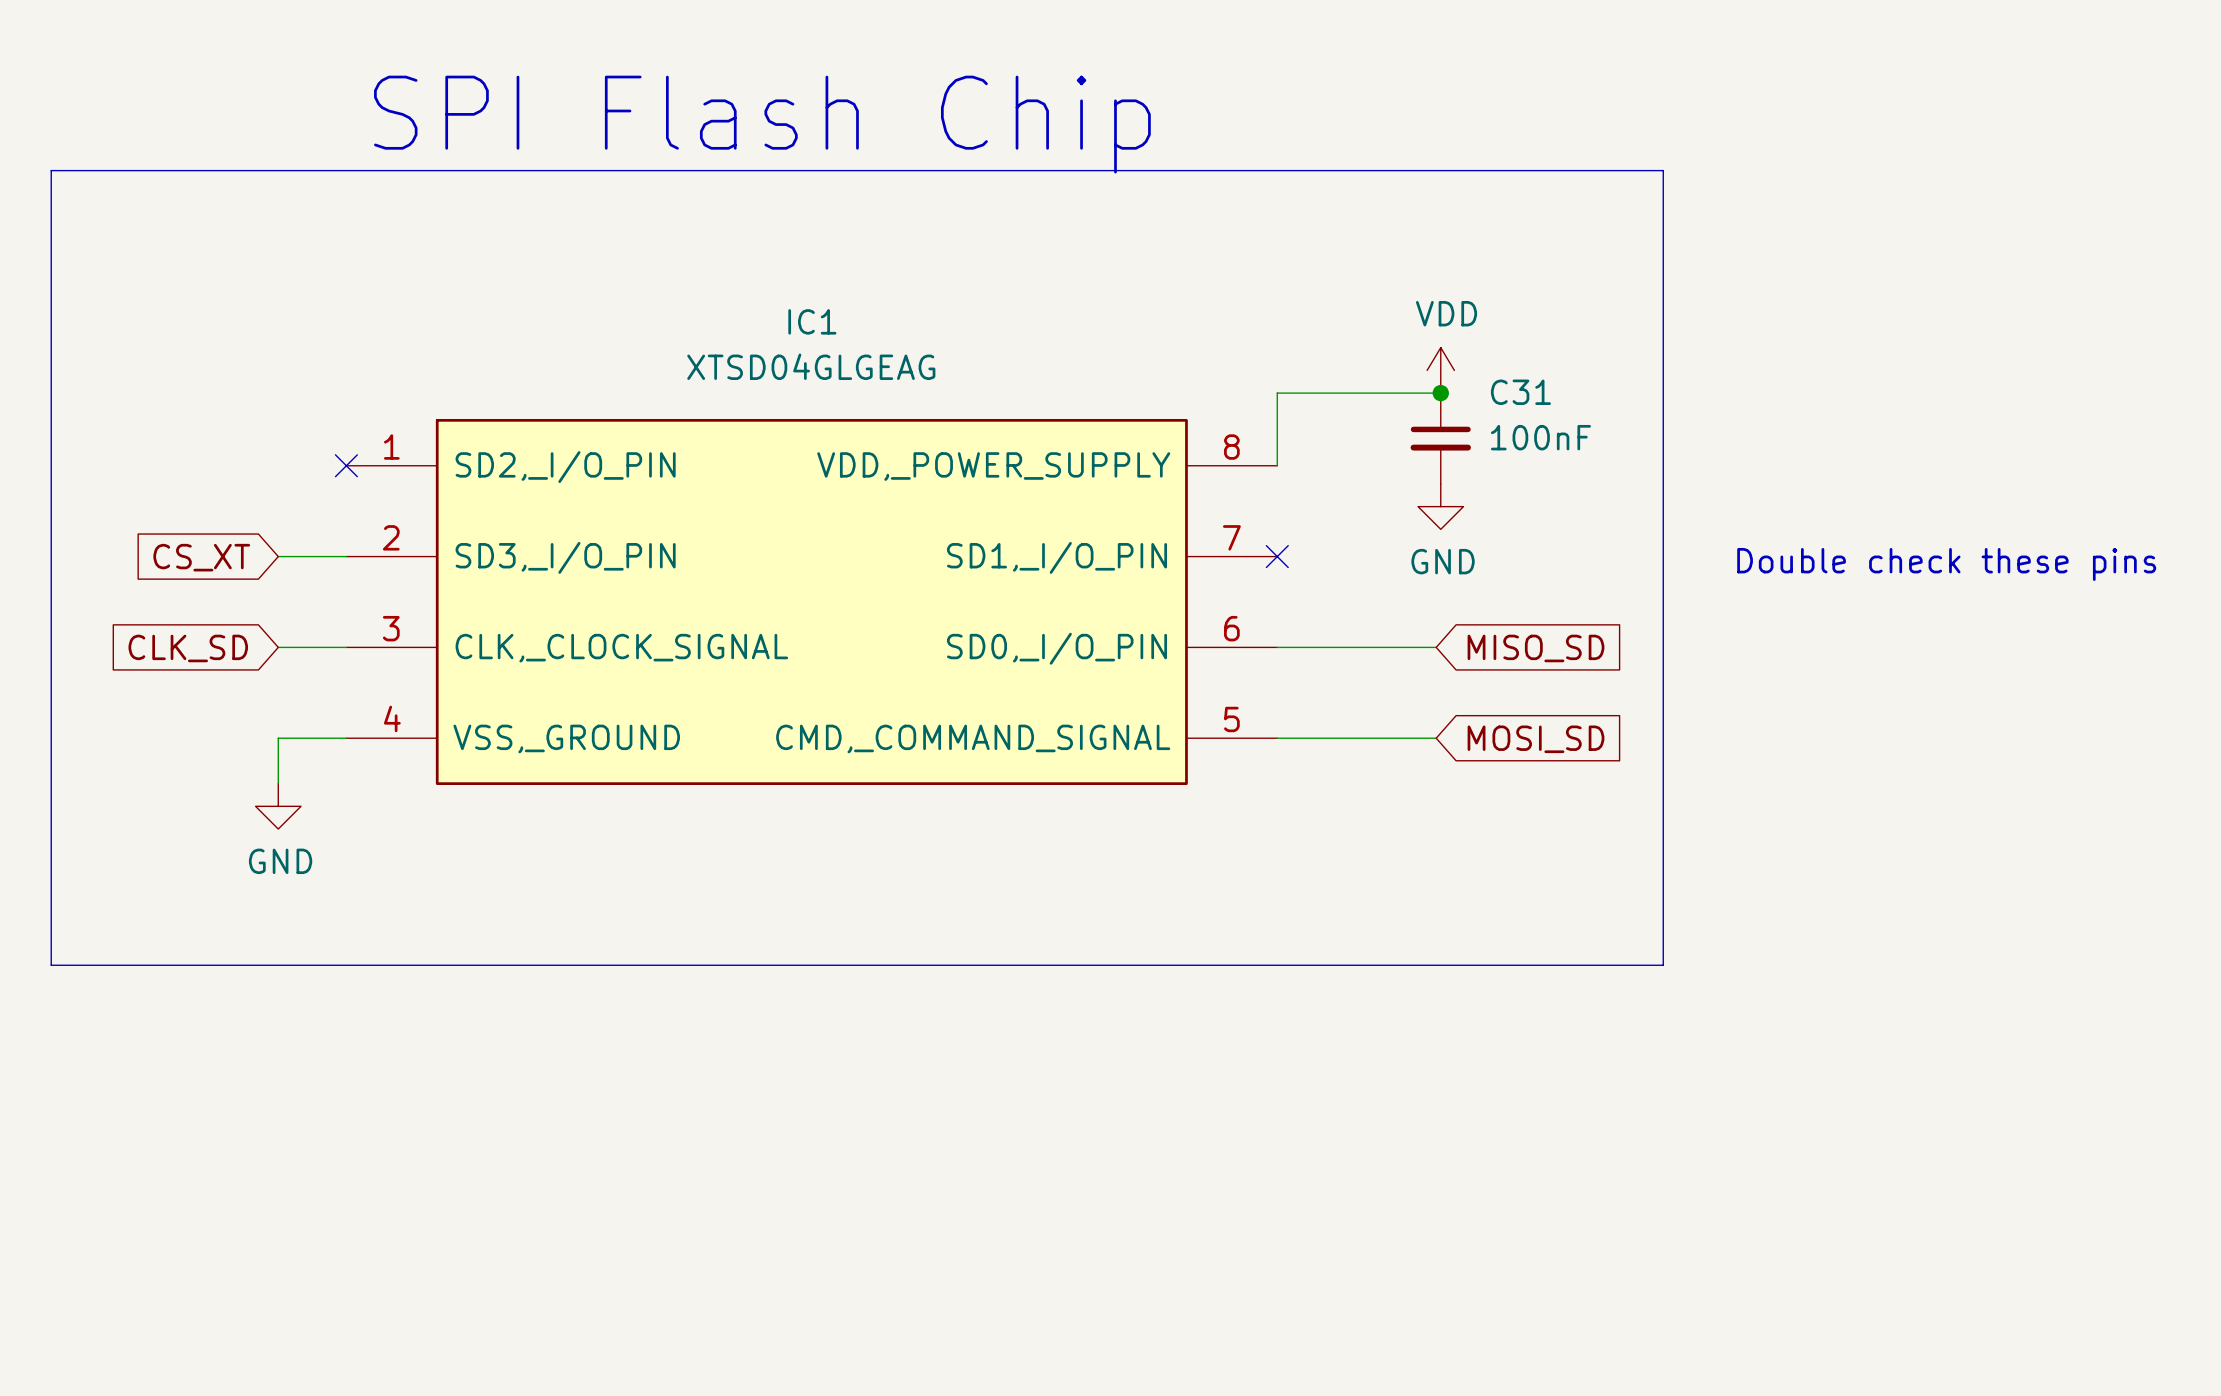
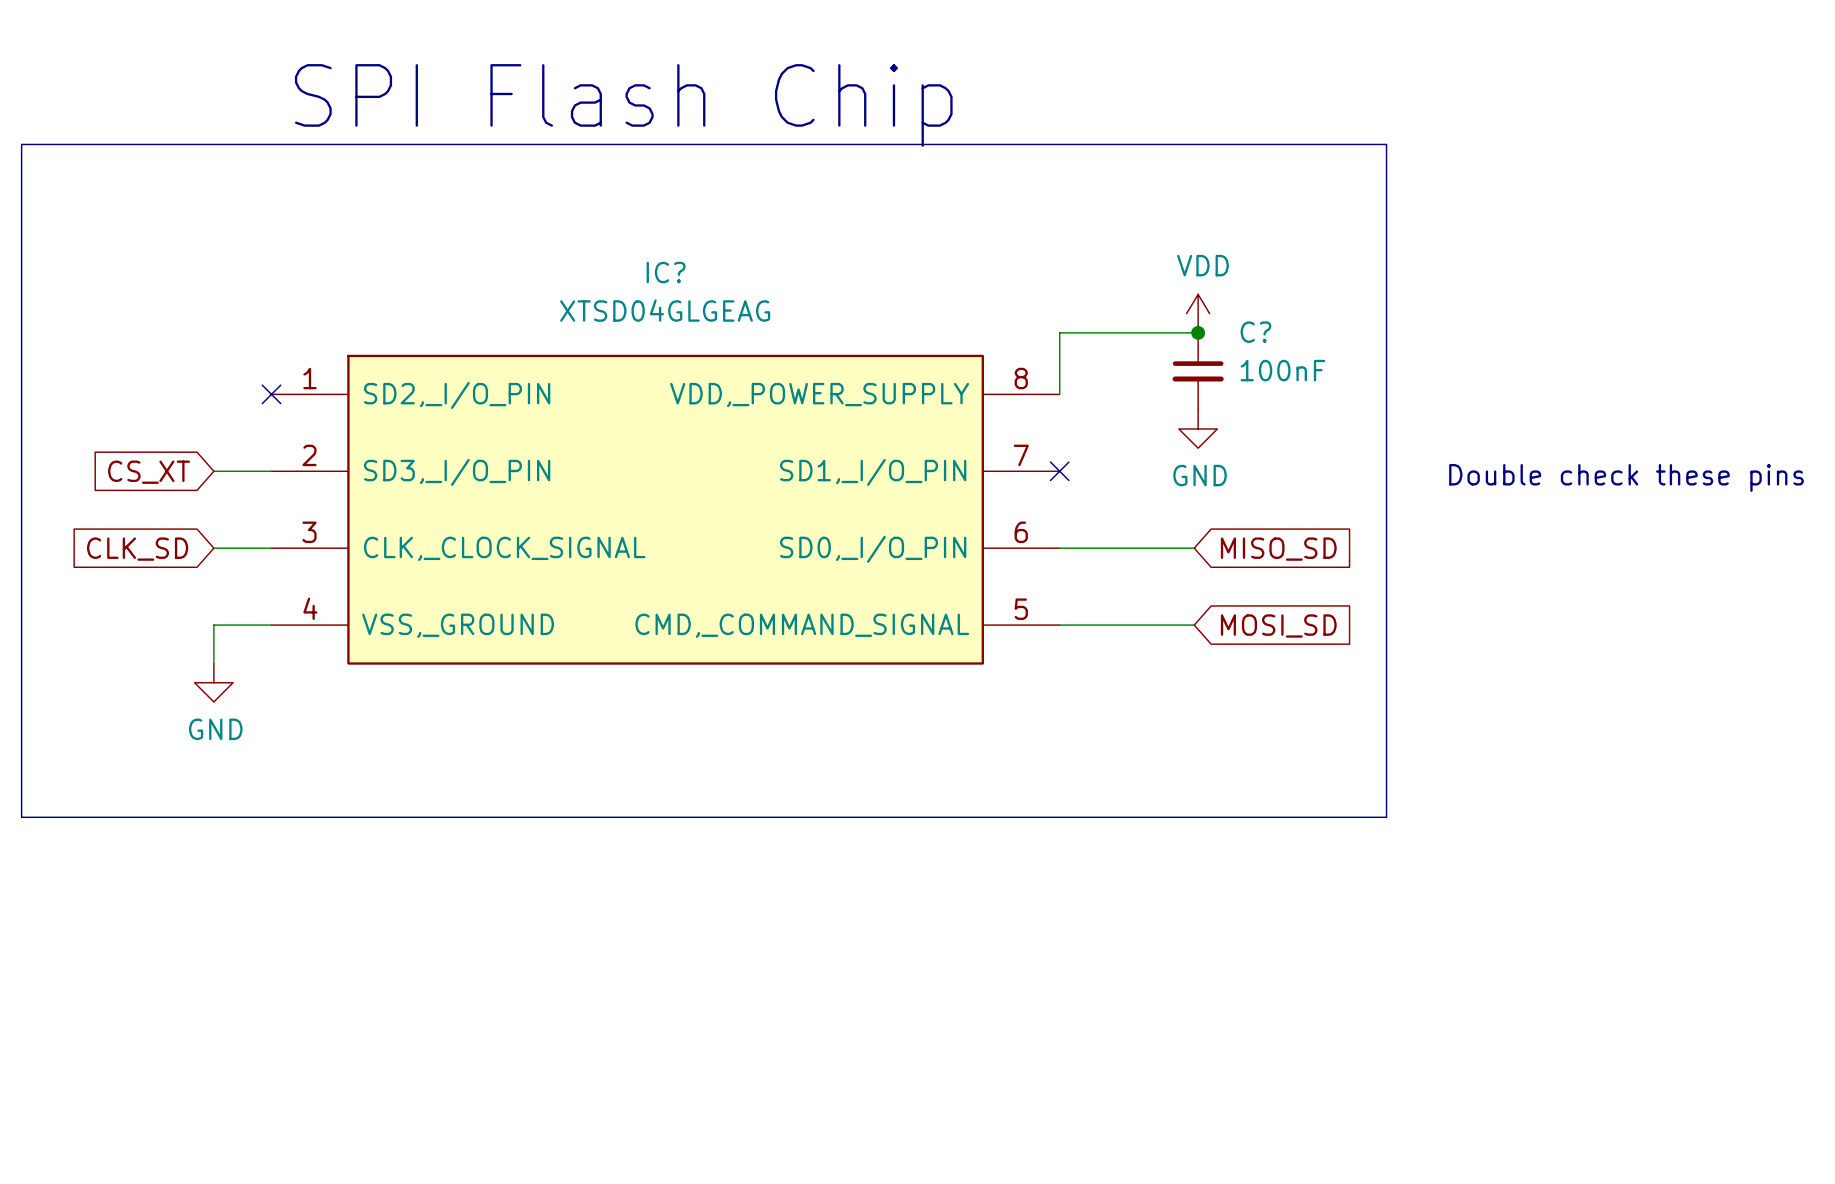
IC1 name: IC1 (812, 321) -> IC? (666, 272)
C31 name: C31 (1520, 392) -> C? (1255, 332)

